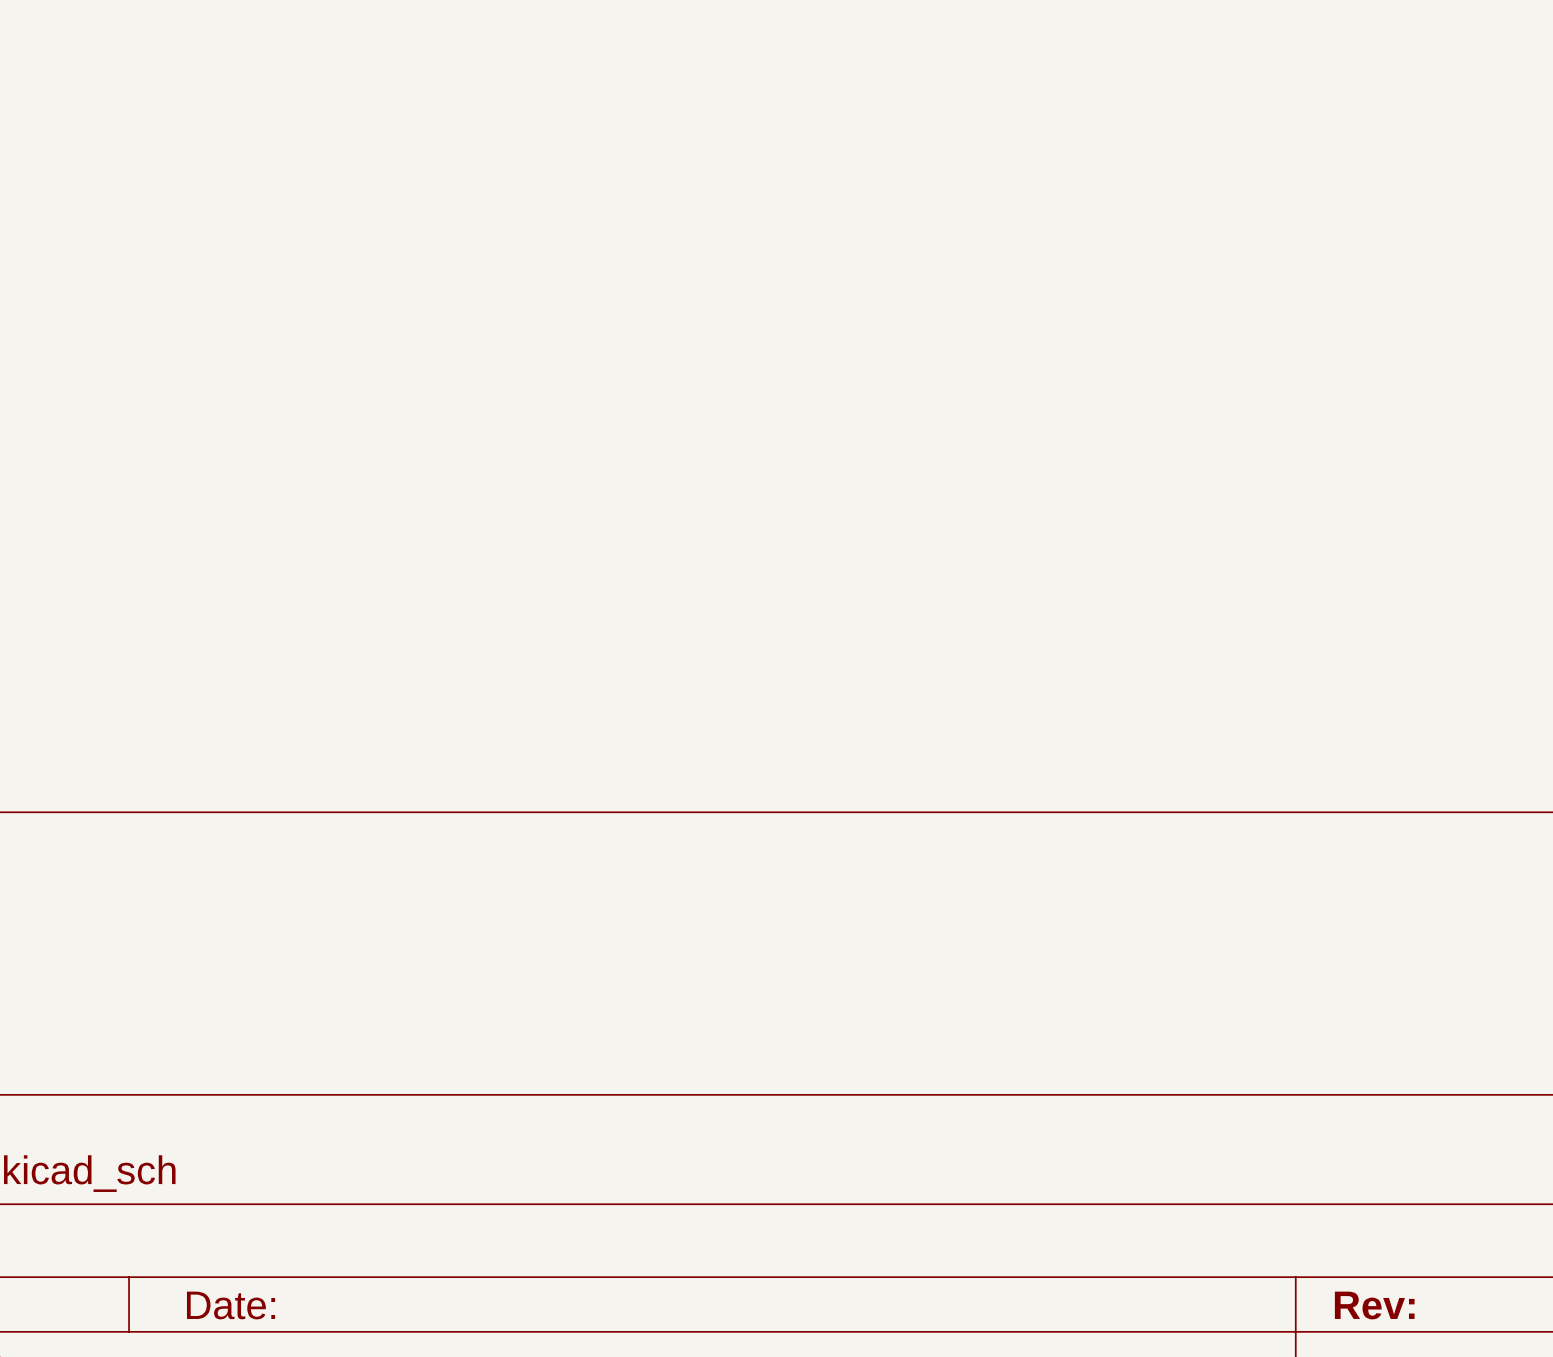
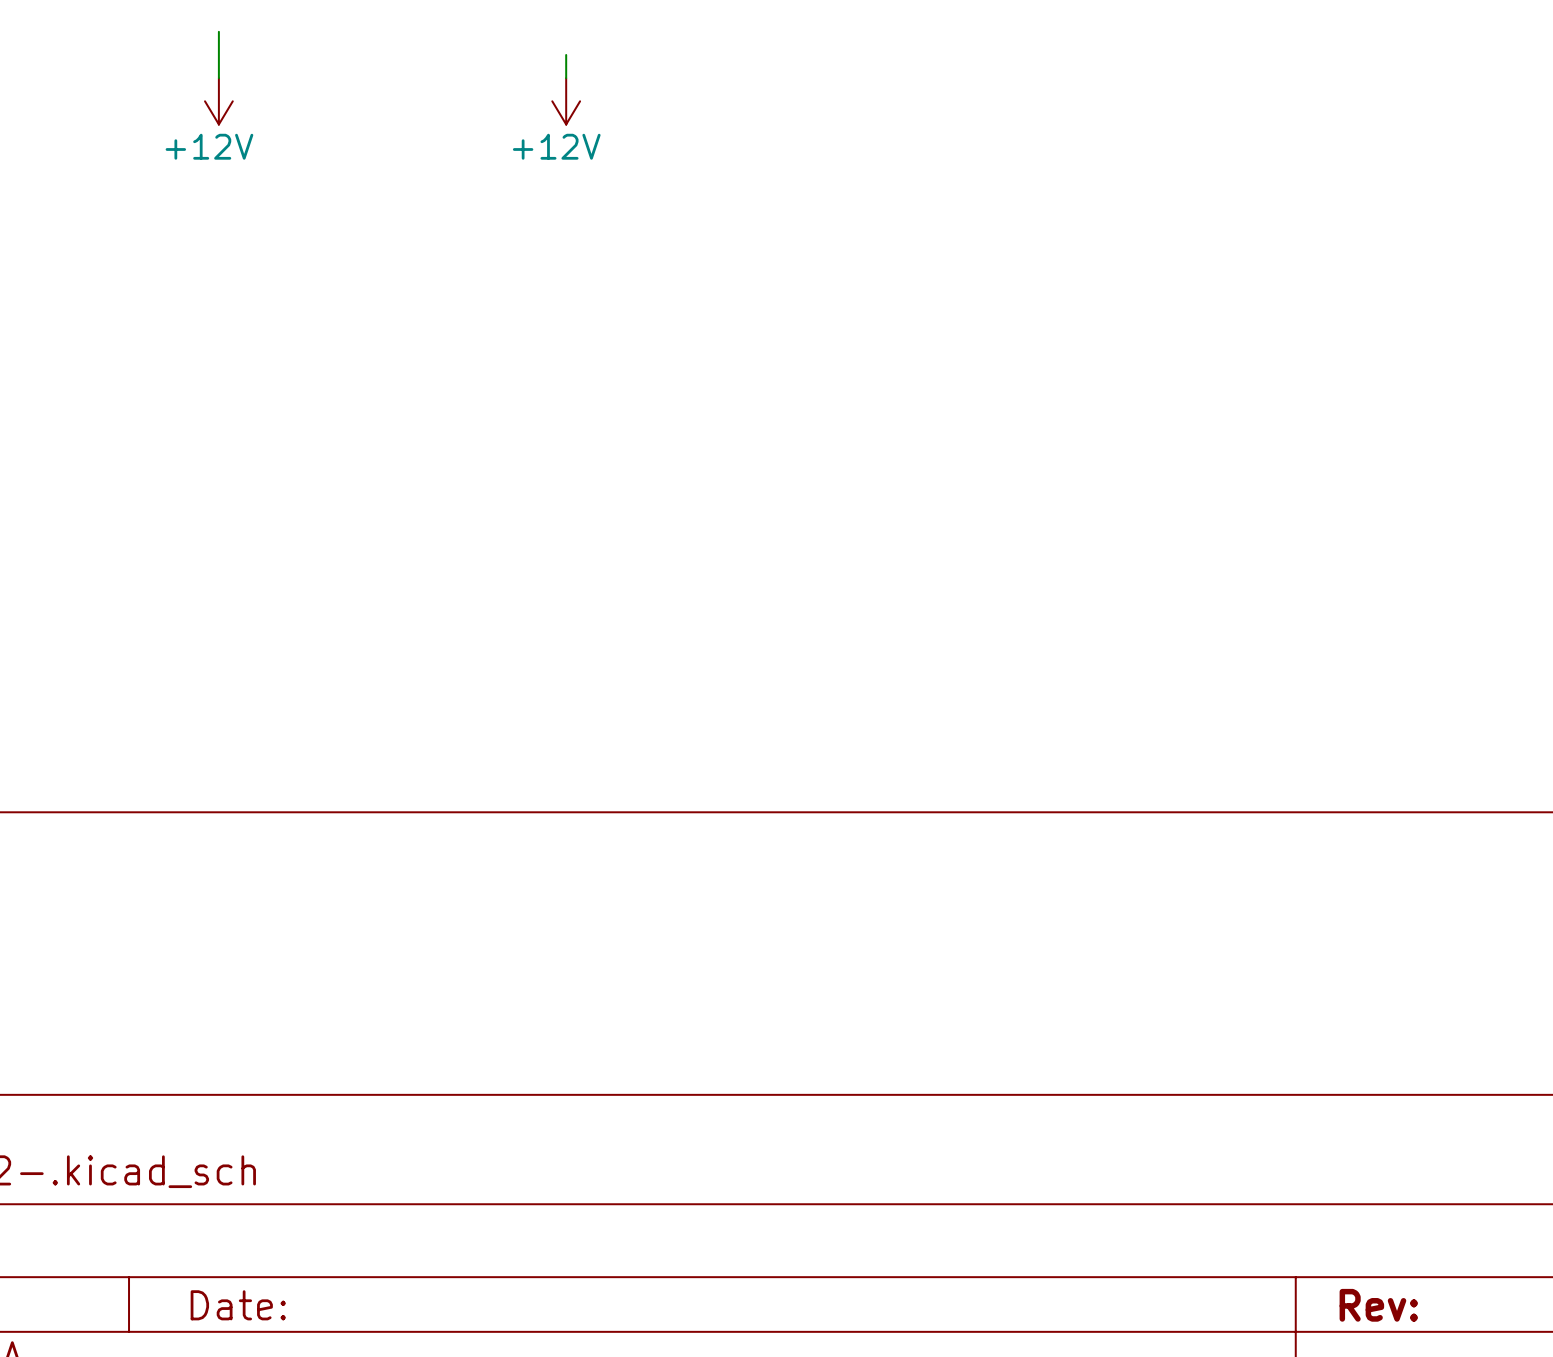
wire: none -> (218, 31) (218, 78)
wire: none -> (566, 54) (566, 78)
power symbol: none -> +12V (218, 101)
power symbol: none -> +12V (566, 101)

